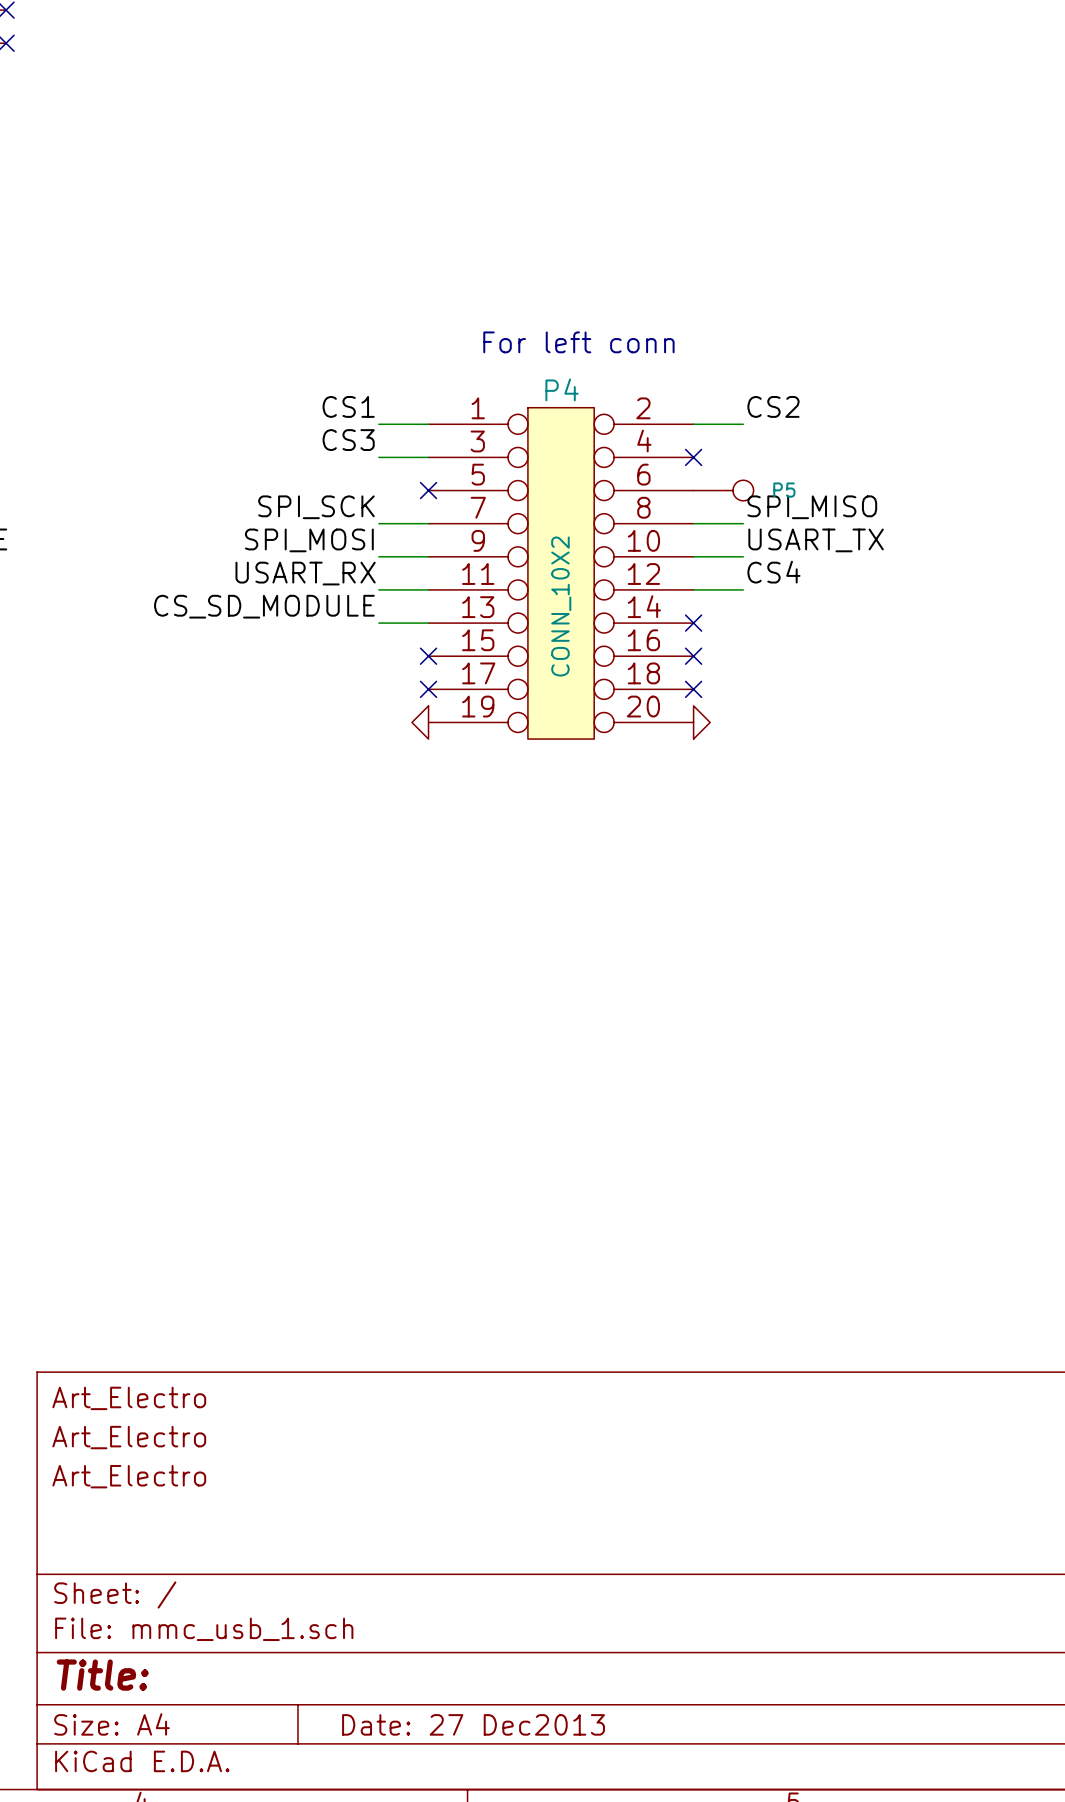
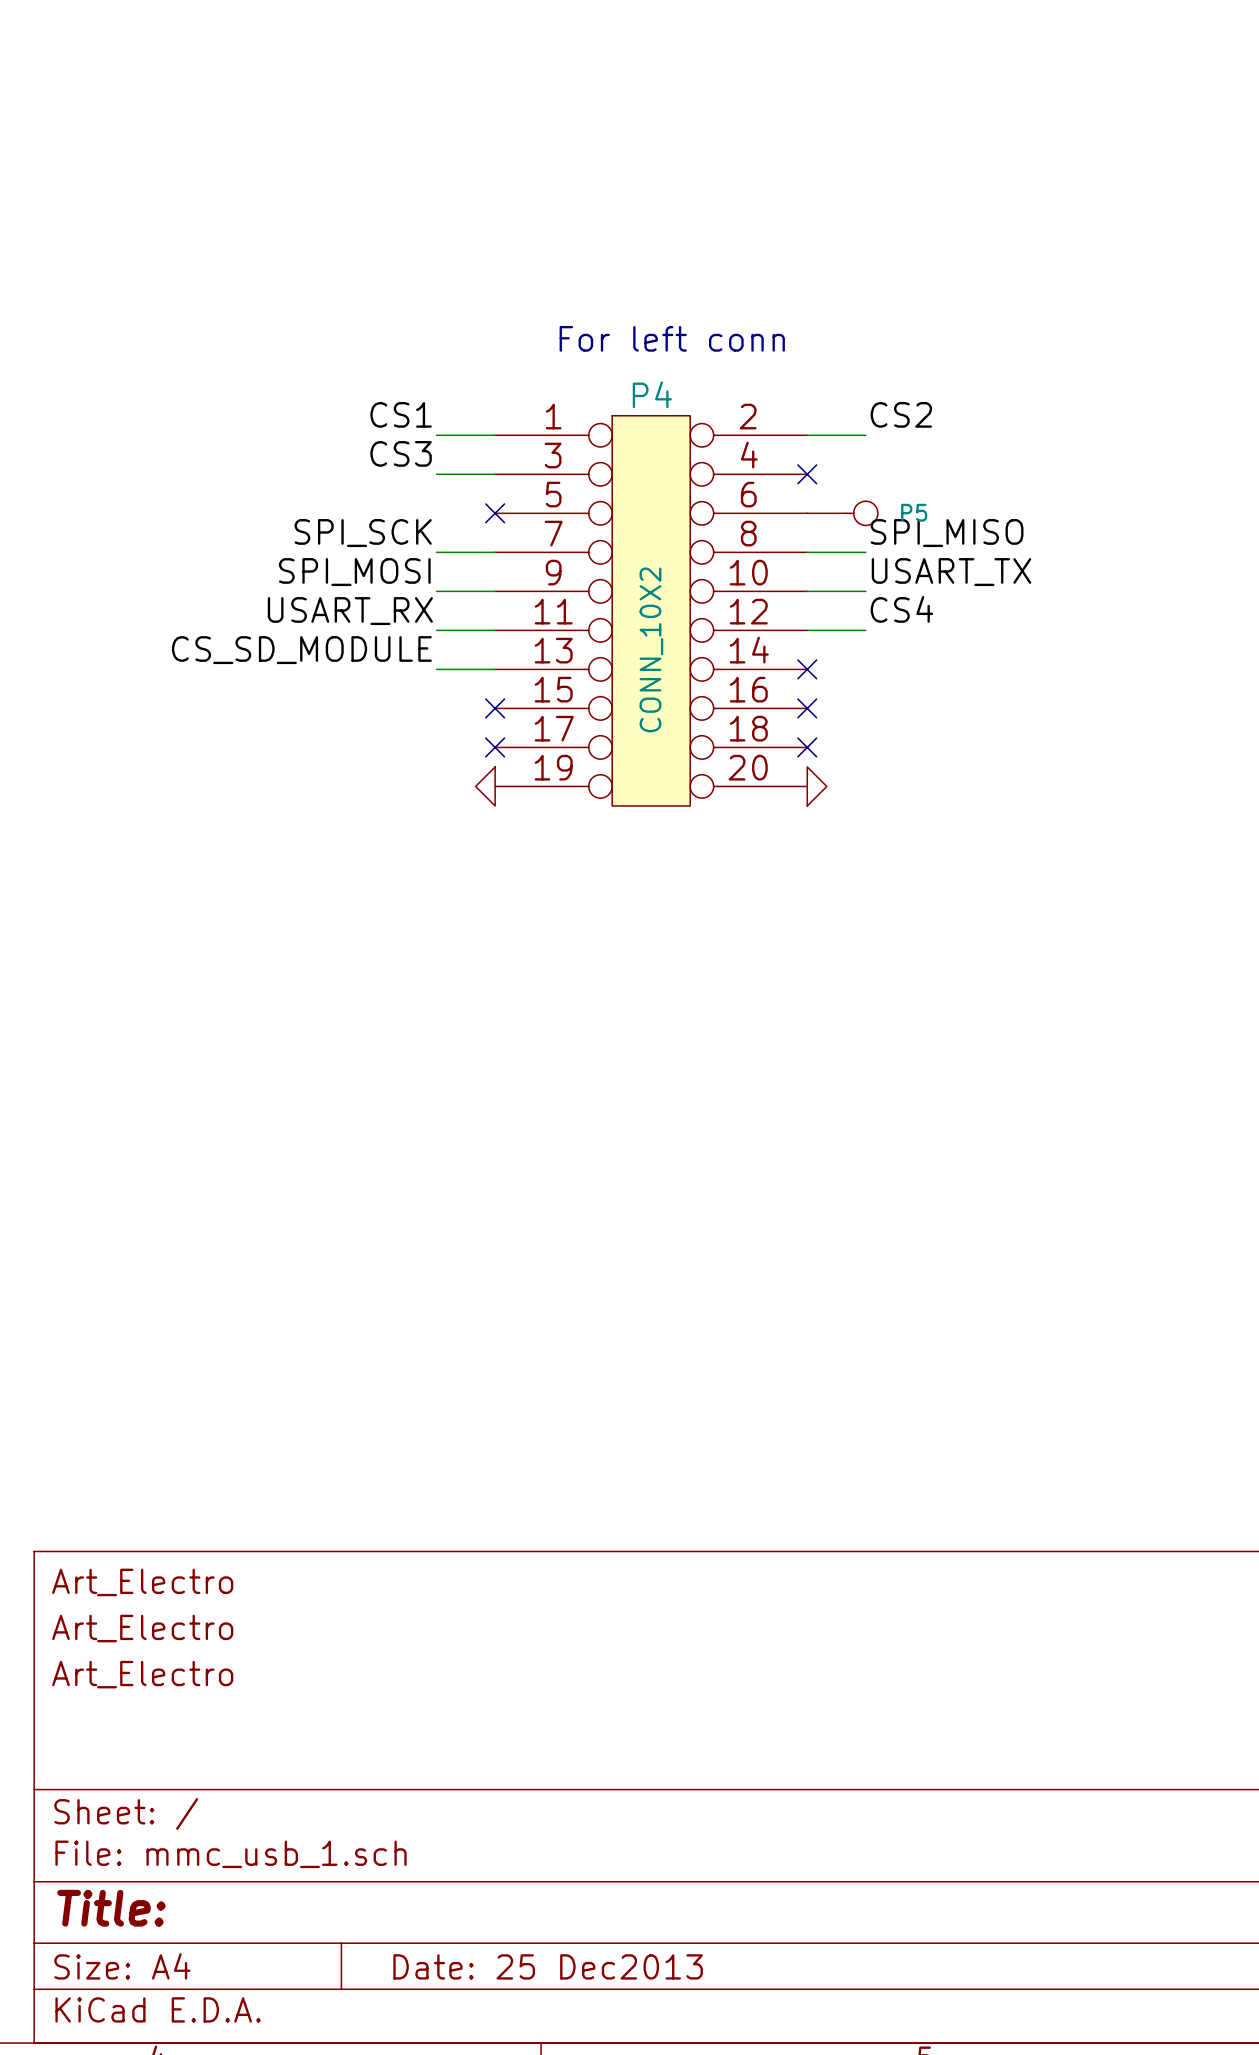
title block: Date: 27 Dec2013 (473, 1724) -> Date: 25 Dec2013 (548, 1966)

